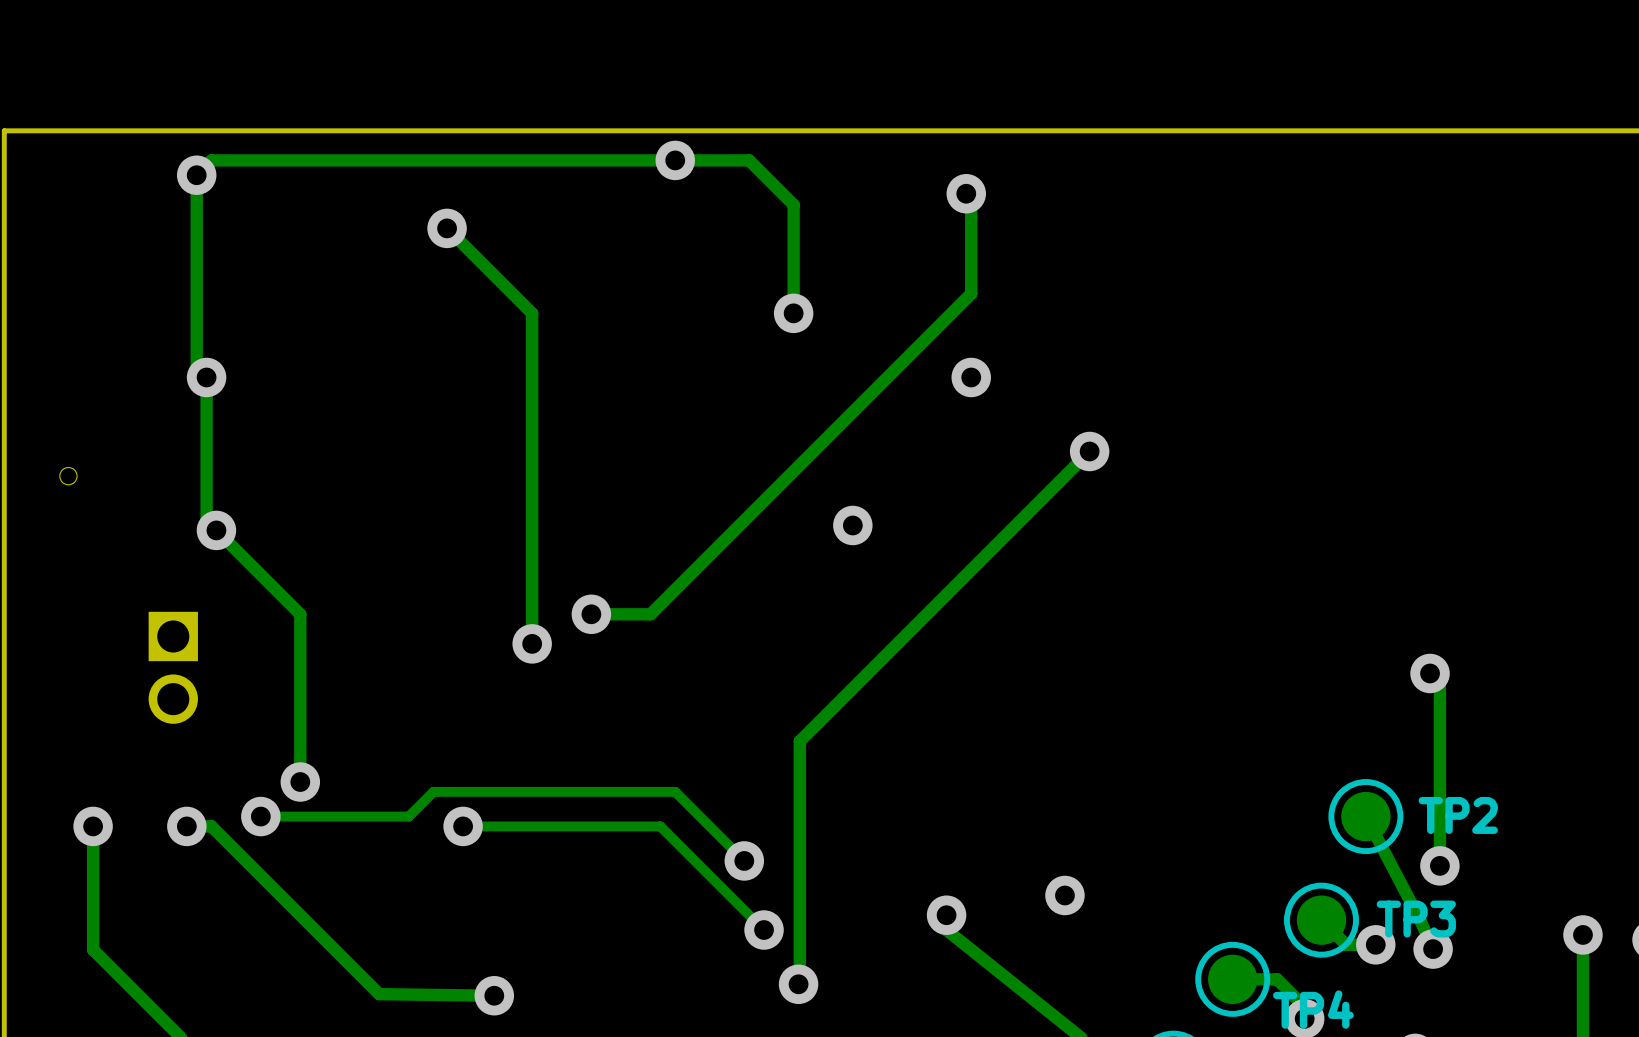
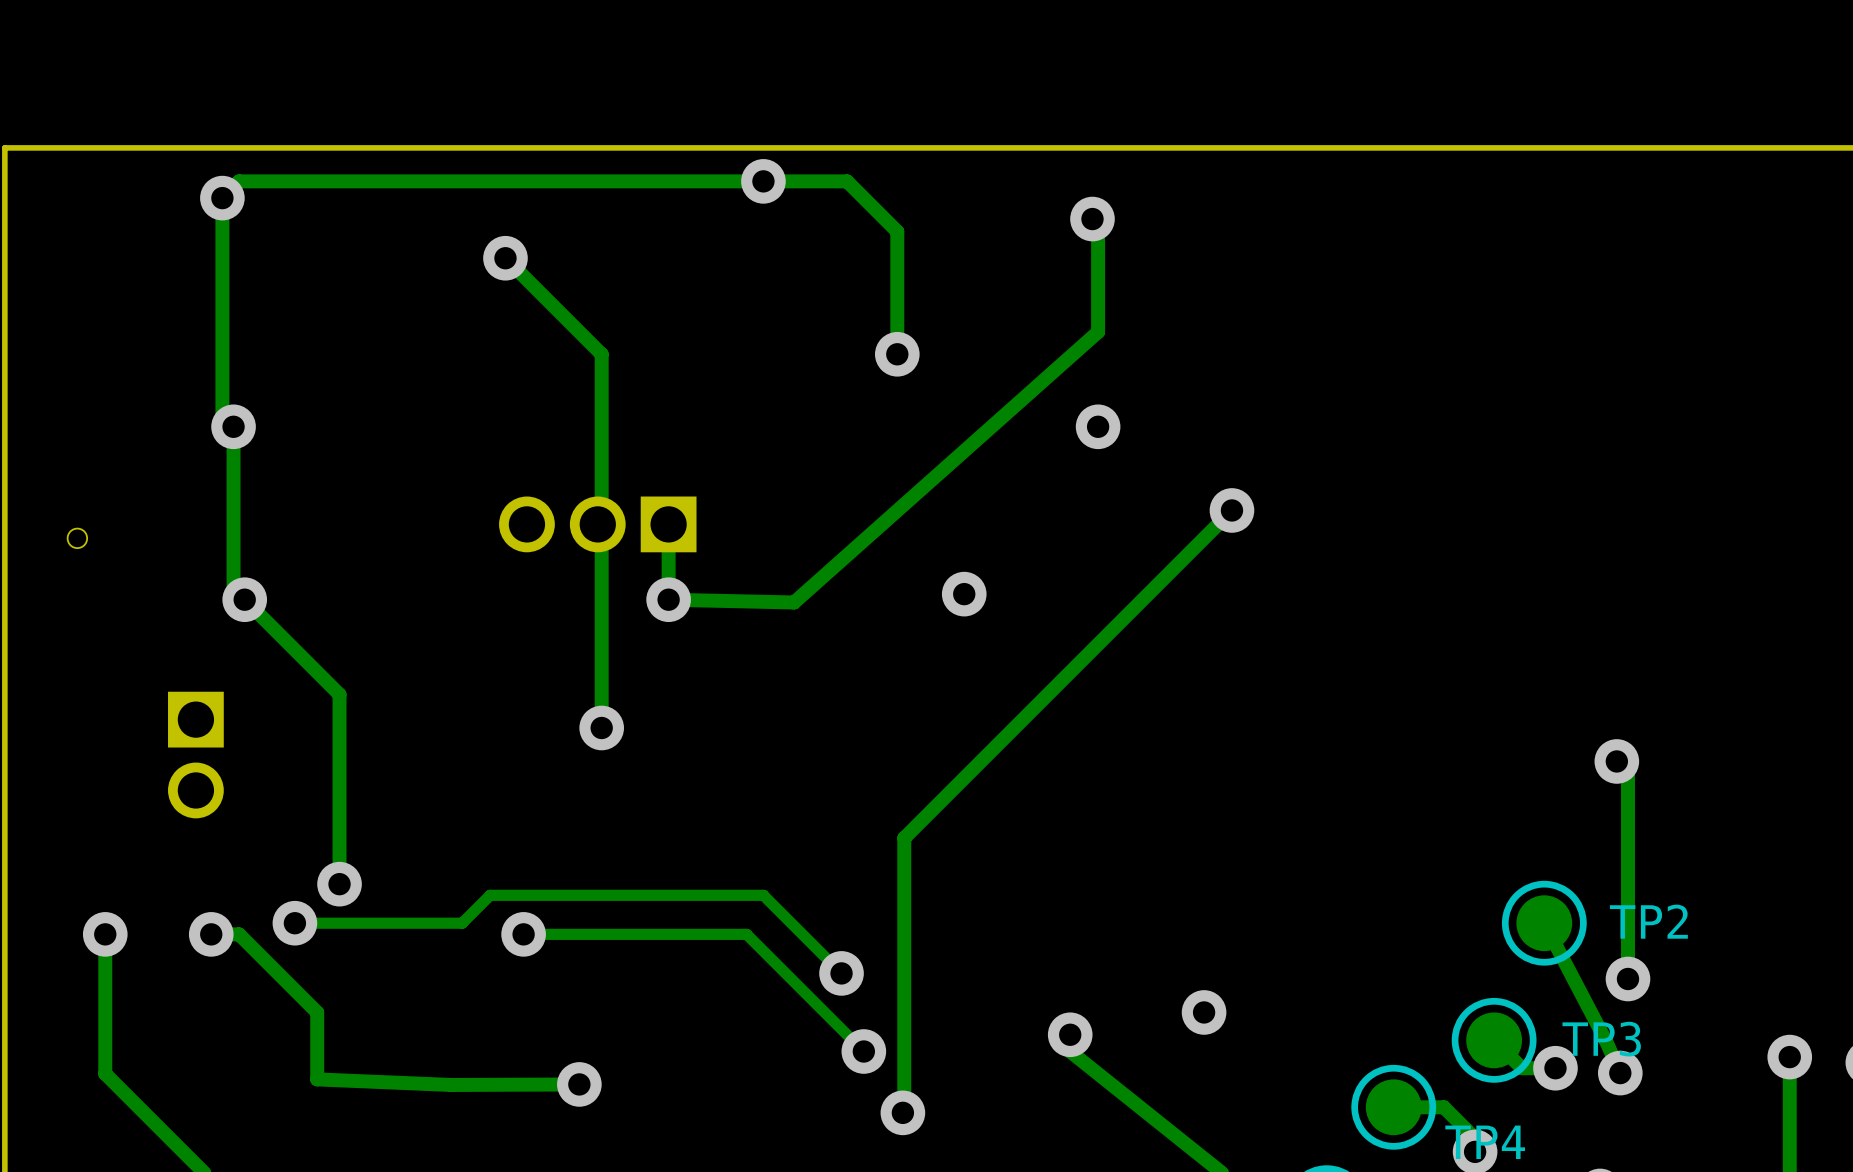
track: (971, 293) (650, 614) (591, 614) -> (1098, 331) (794, 602) (668, 599) (668, 524)
part: none -> (597, 524)
via position: (591, 614) -> (668, 599)
track: (280, 895) (379, 994) (494, 995) -> (317, 1012) (317, 1079) (451, 1084) (579, 1084)
via position: (494, 995) -> (579, 1084)

